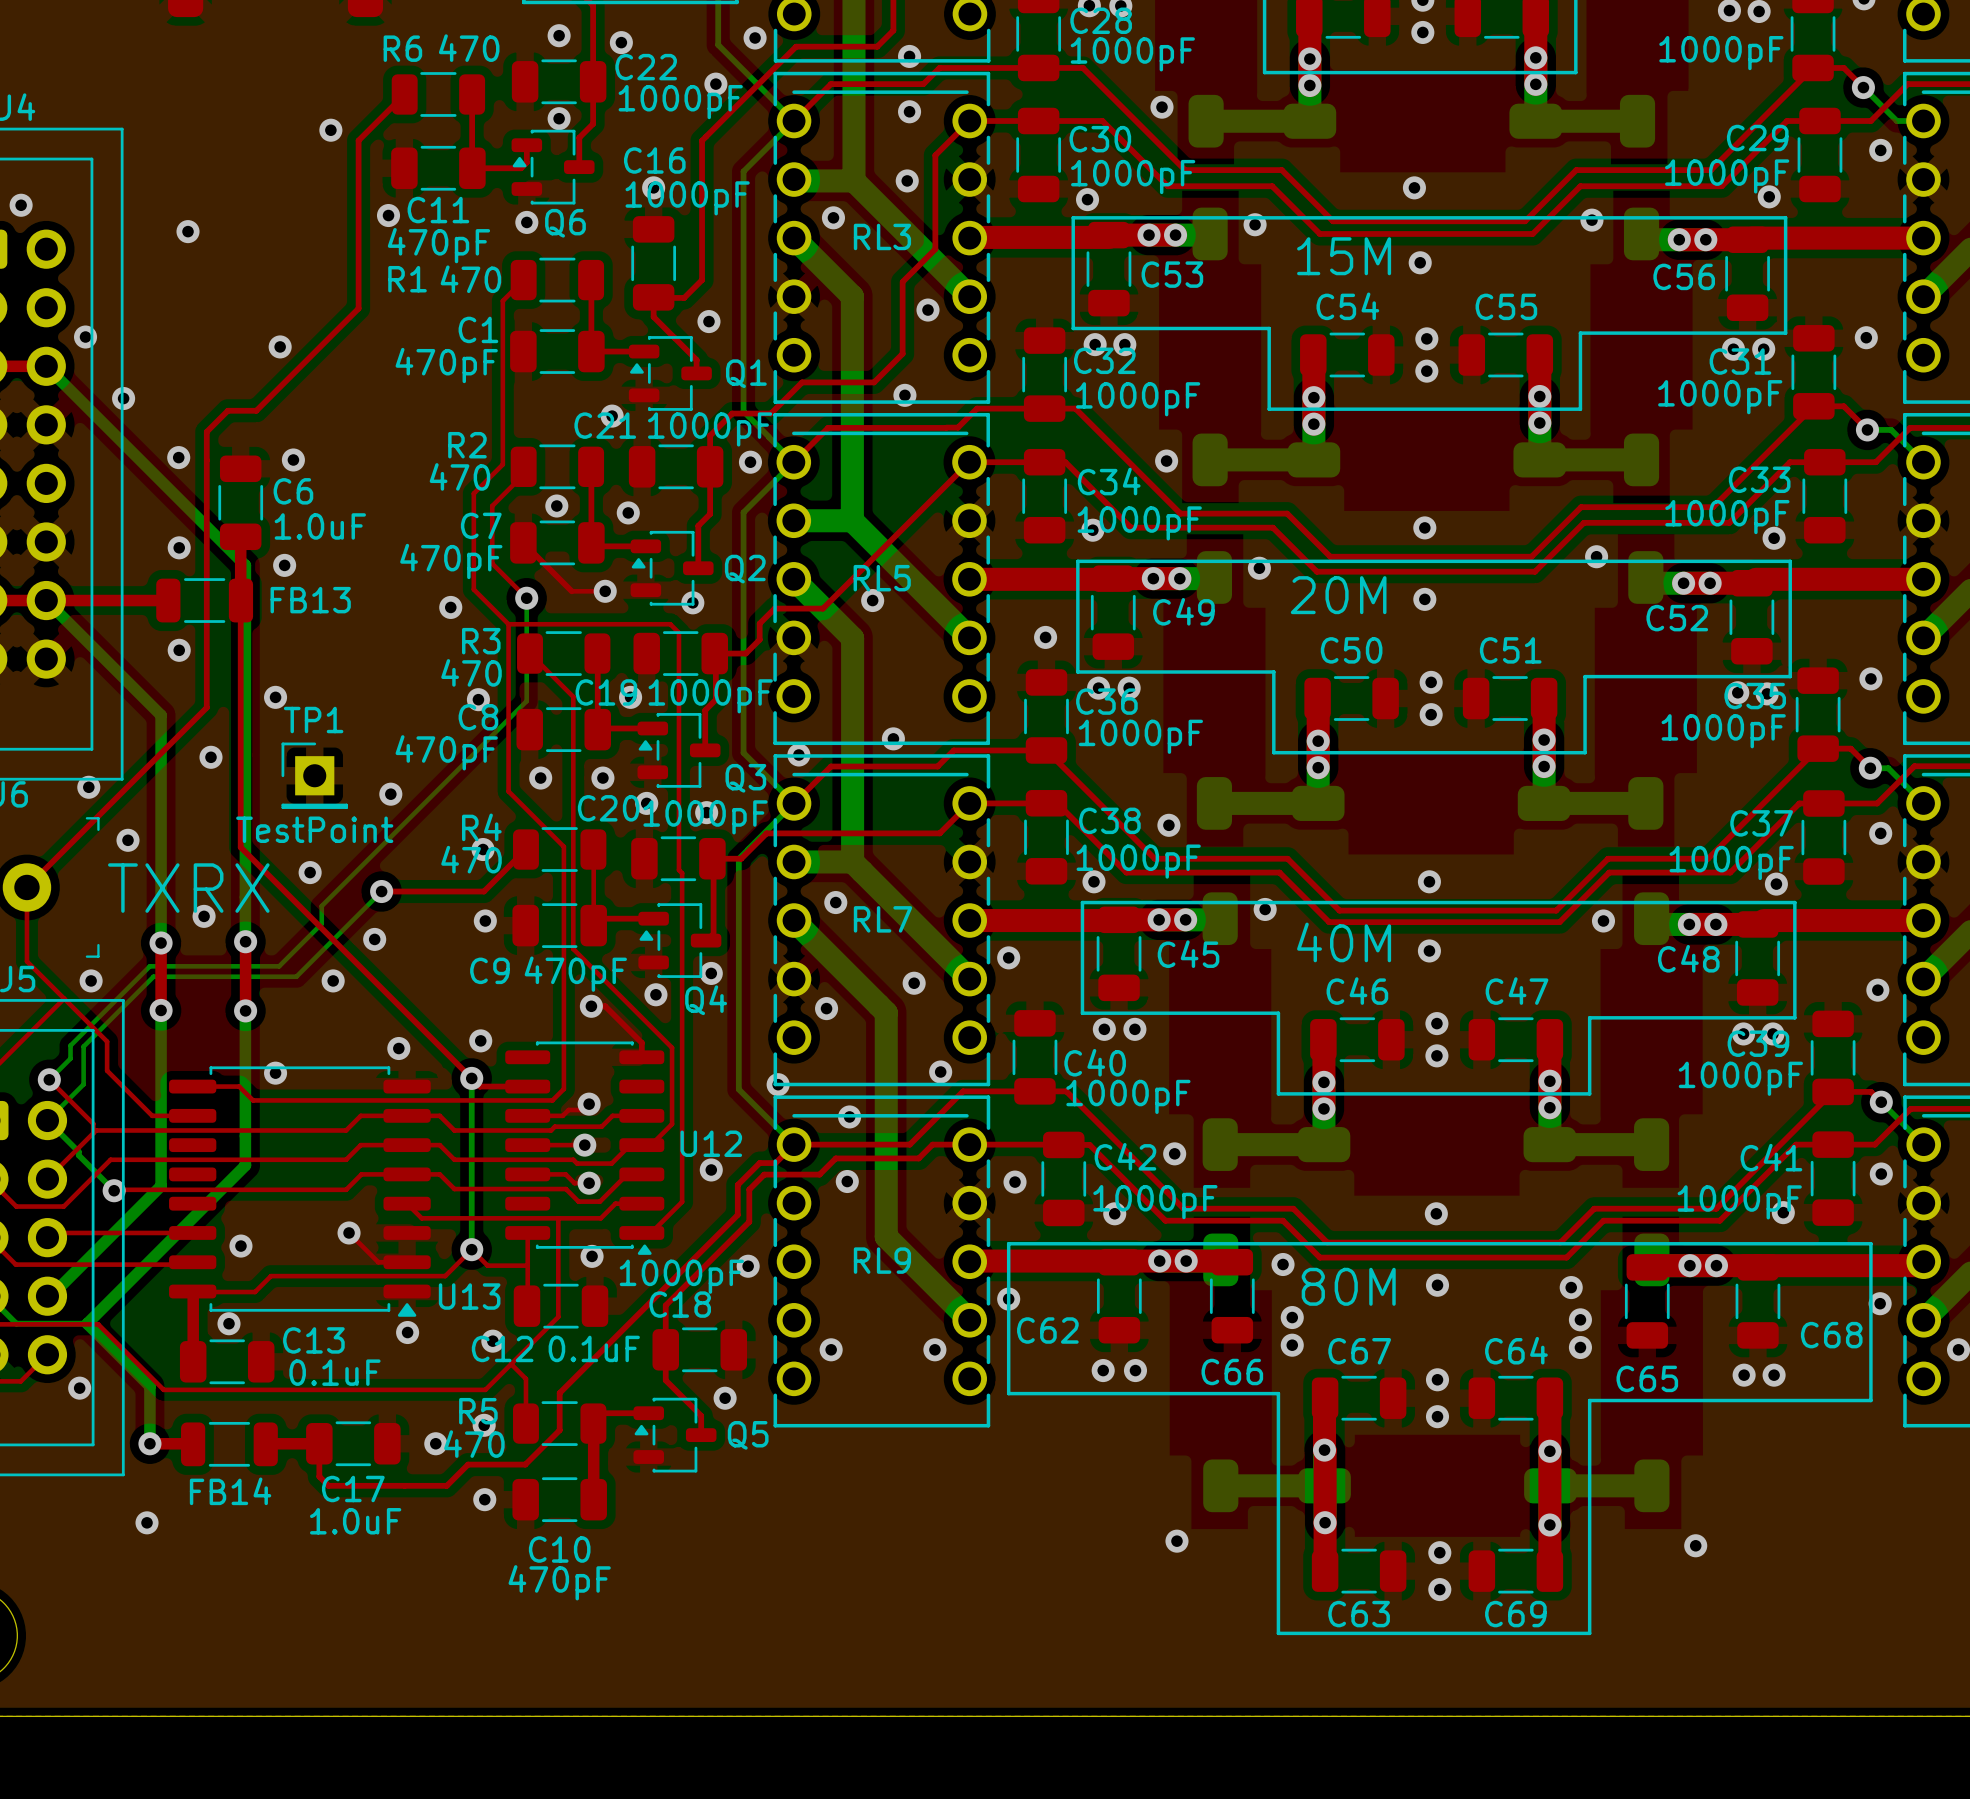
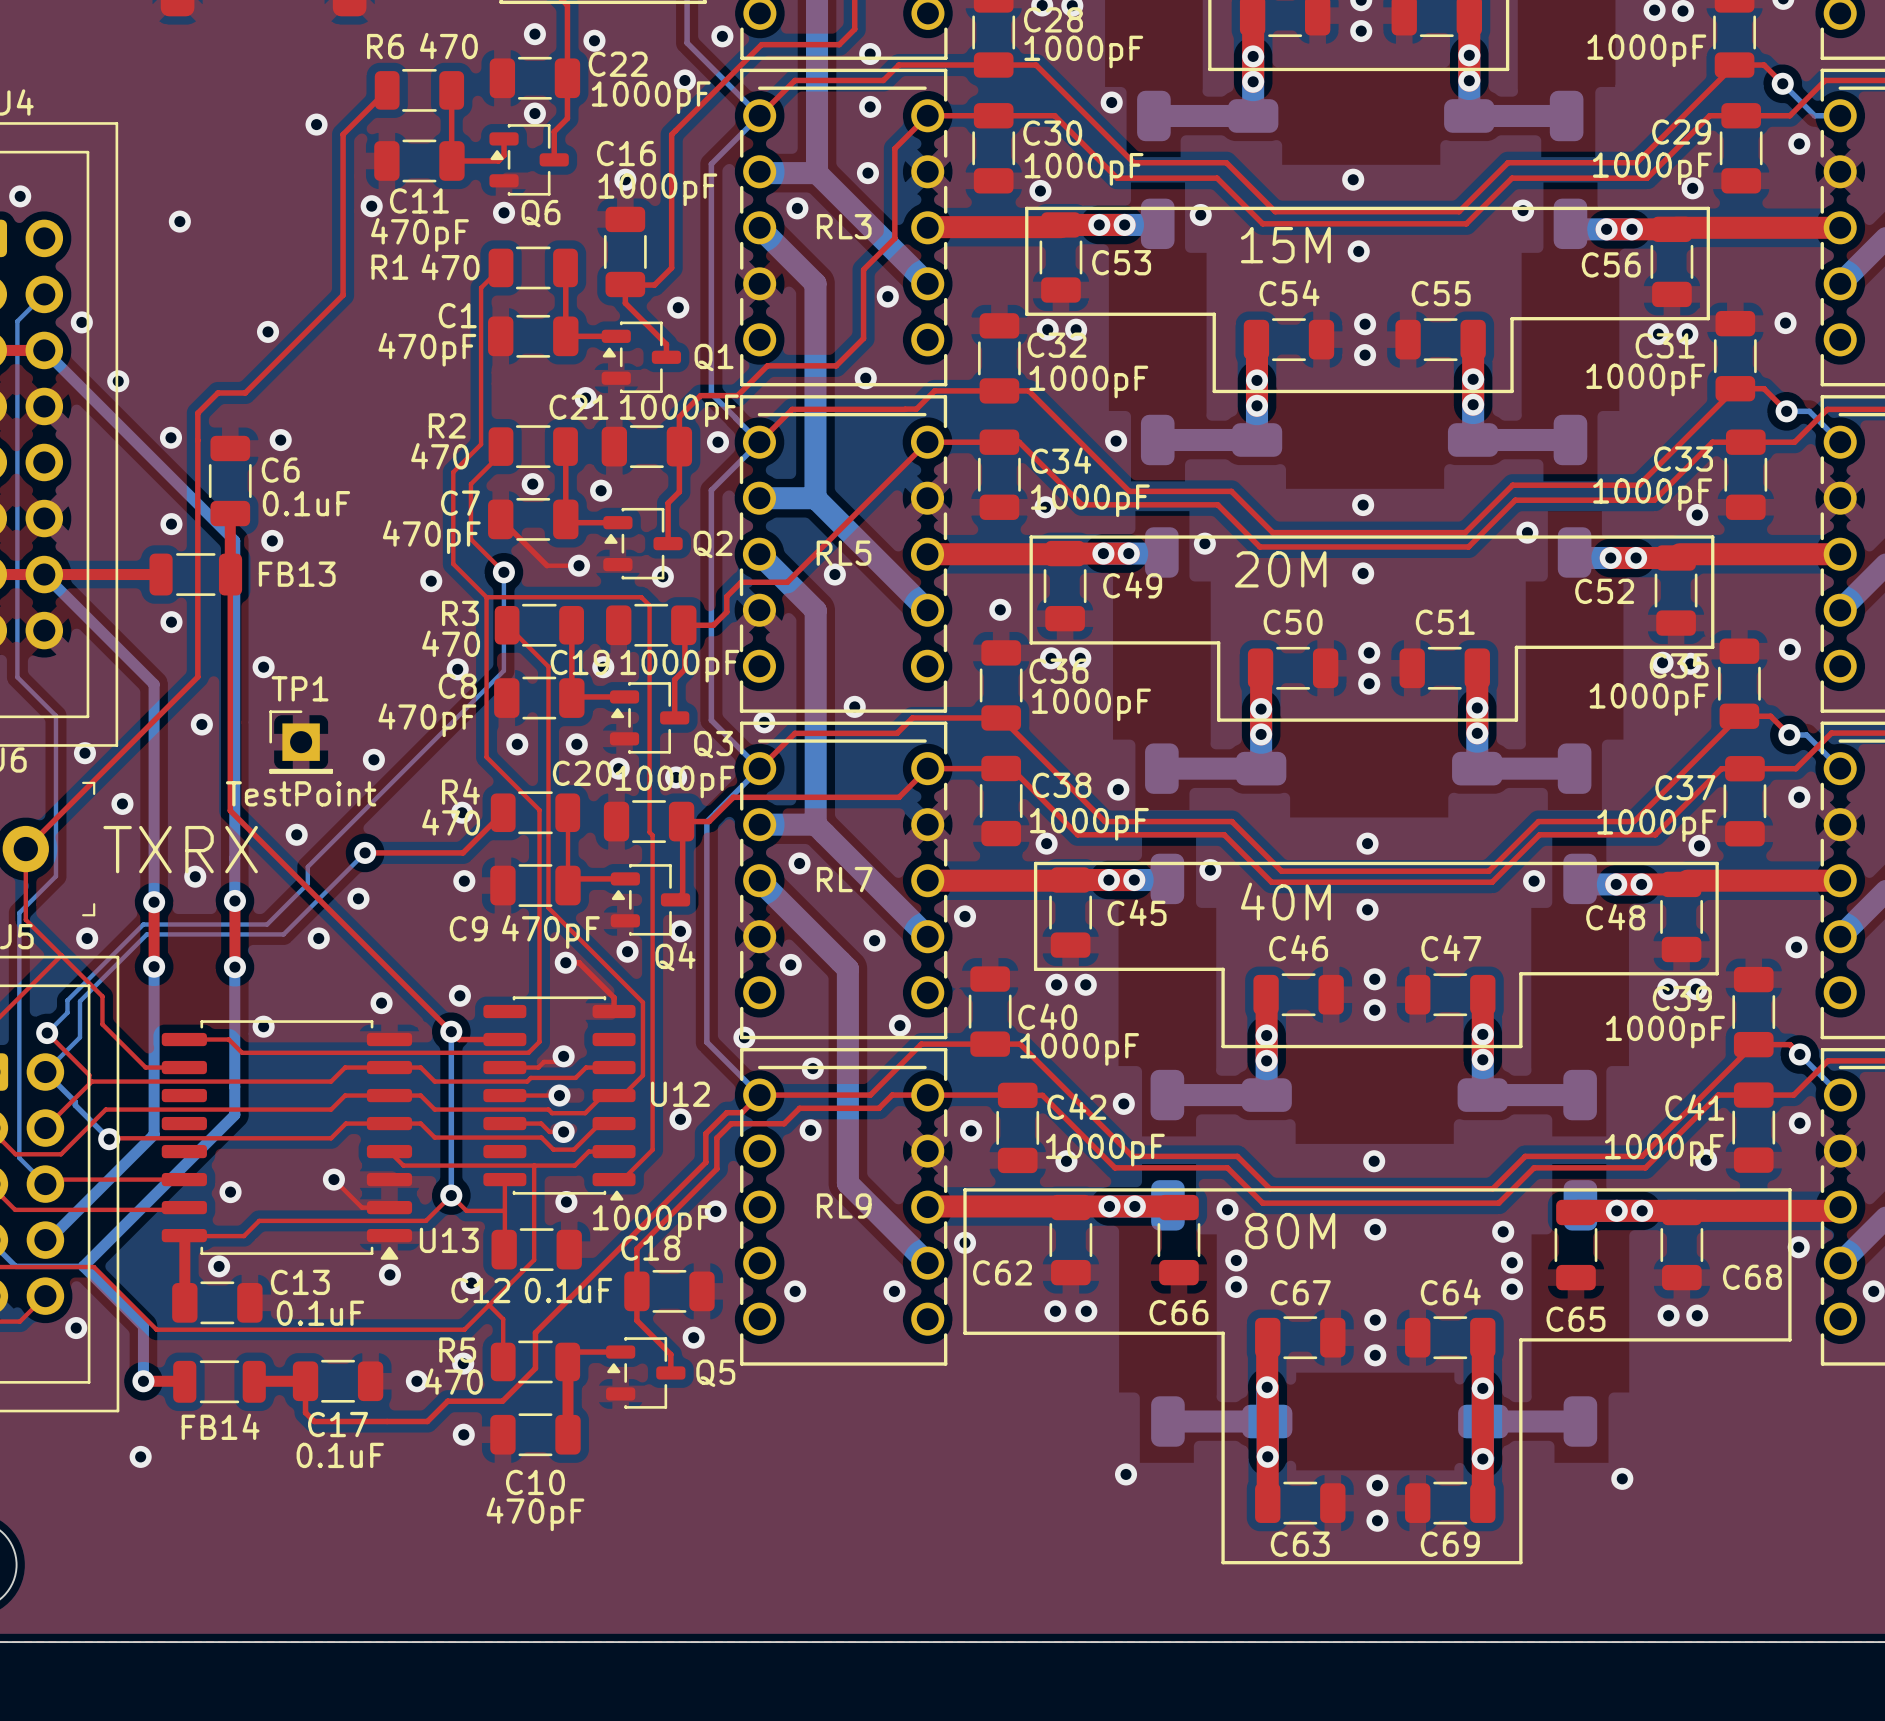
bottom track: none -> (44, 294) (17, 321) (17, 677) (55, 715) (55, 876) (19, 912) (19, 1157) (45, 1184)
C6 value: 1.0uF (320, 526) -> 0.1uF (306, 503)
C17 value: 1.0uF (355, 1521) -> 0.1uF (340, 1455)

